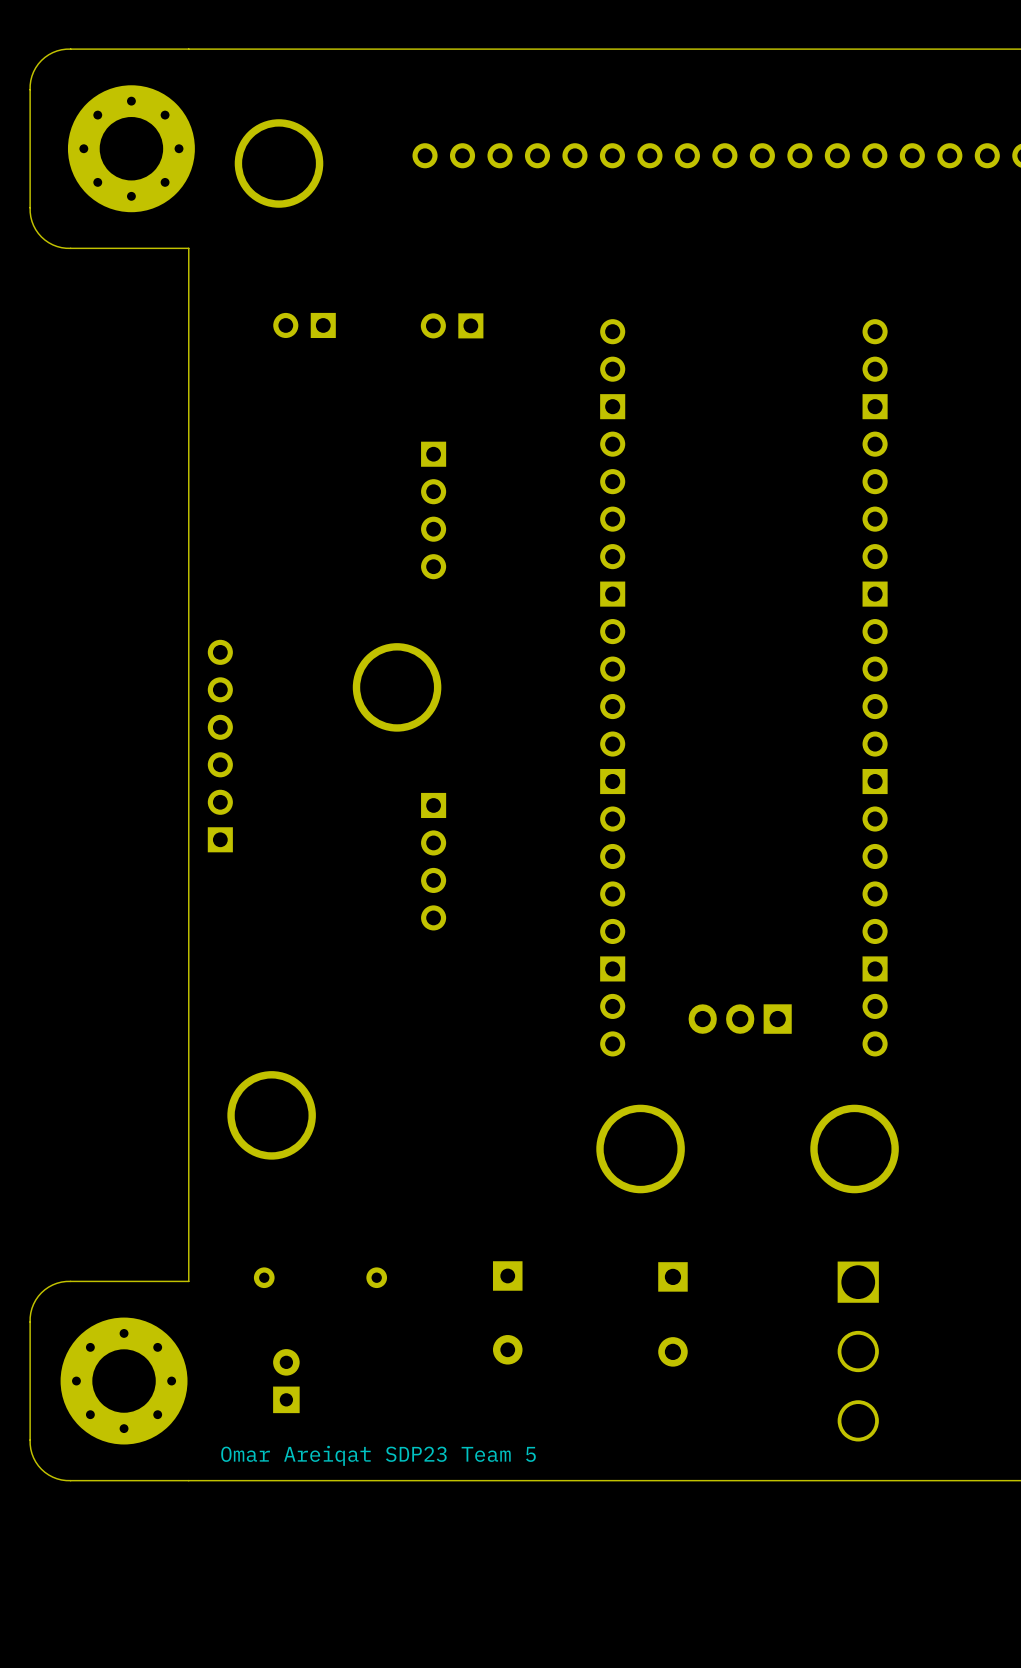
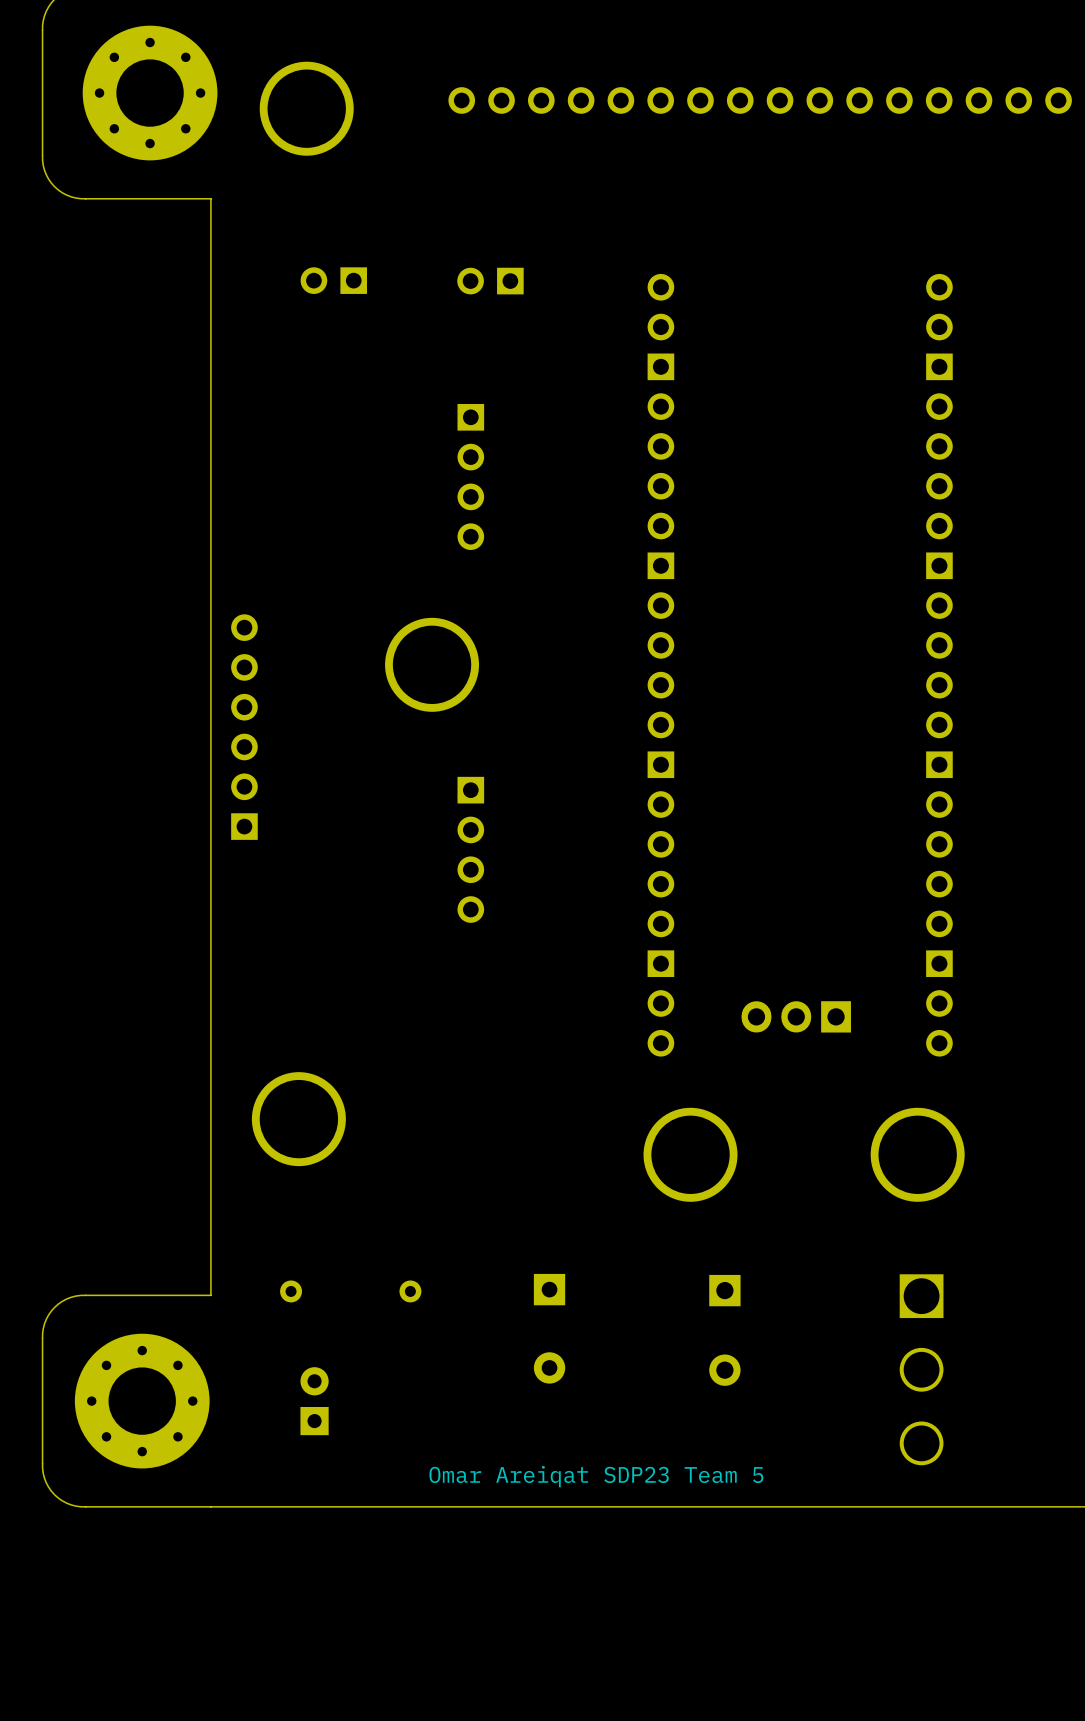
text position: Omar Areiqat SDP23 Team 5 (378, 1455) -> Omar Areiqat SDP23 Team 5 (596, 1476)

